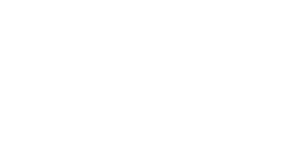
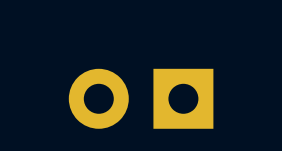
part: none -> (141, 98)

